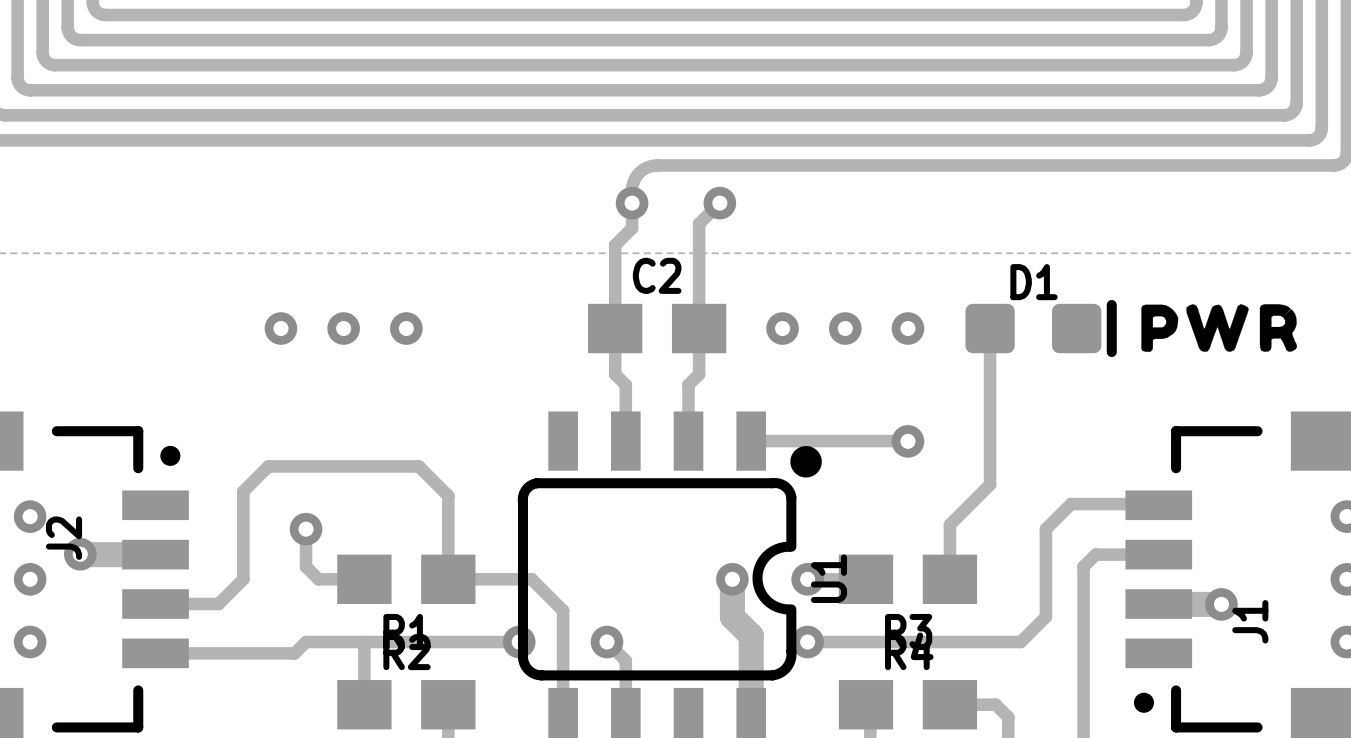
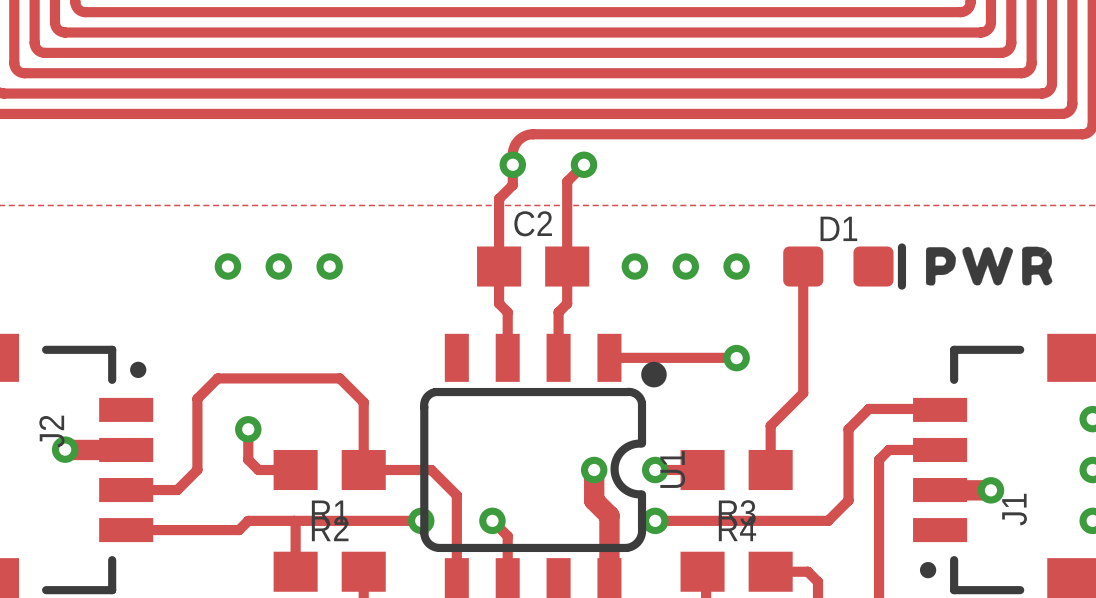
via: (30, 516) -> none
via: (30, 579) -> none
via: (30, 642) -> none

